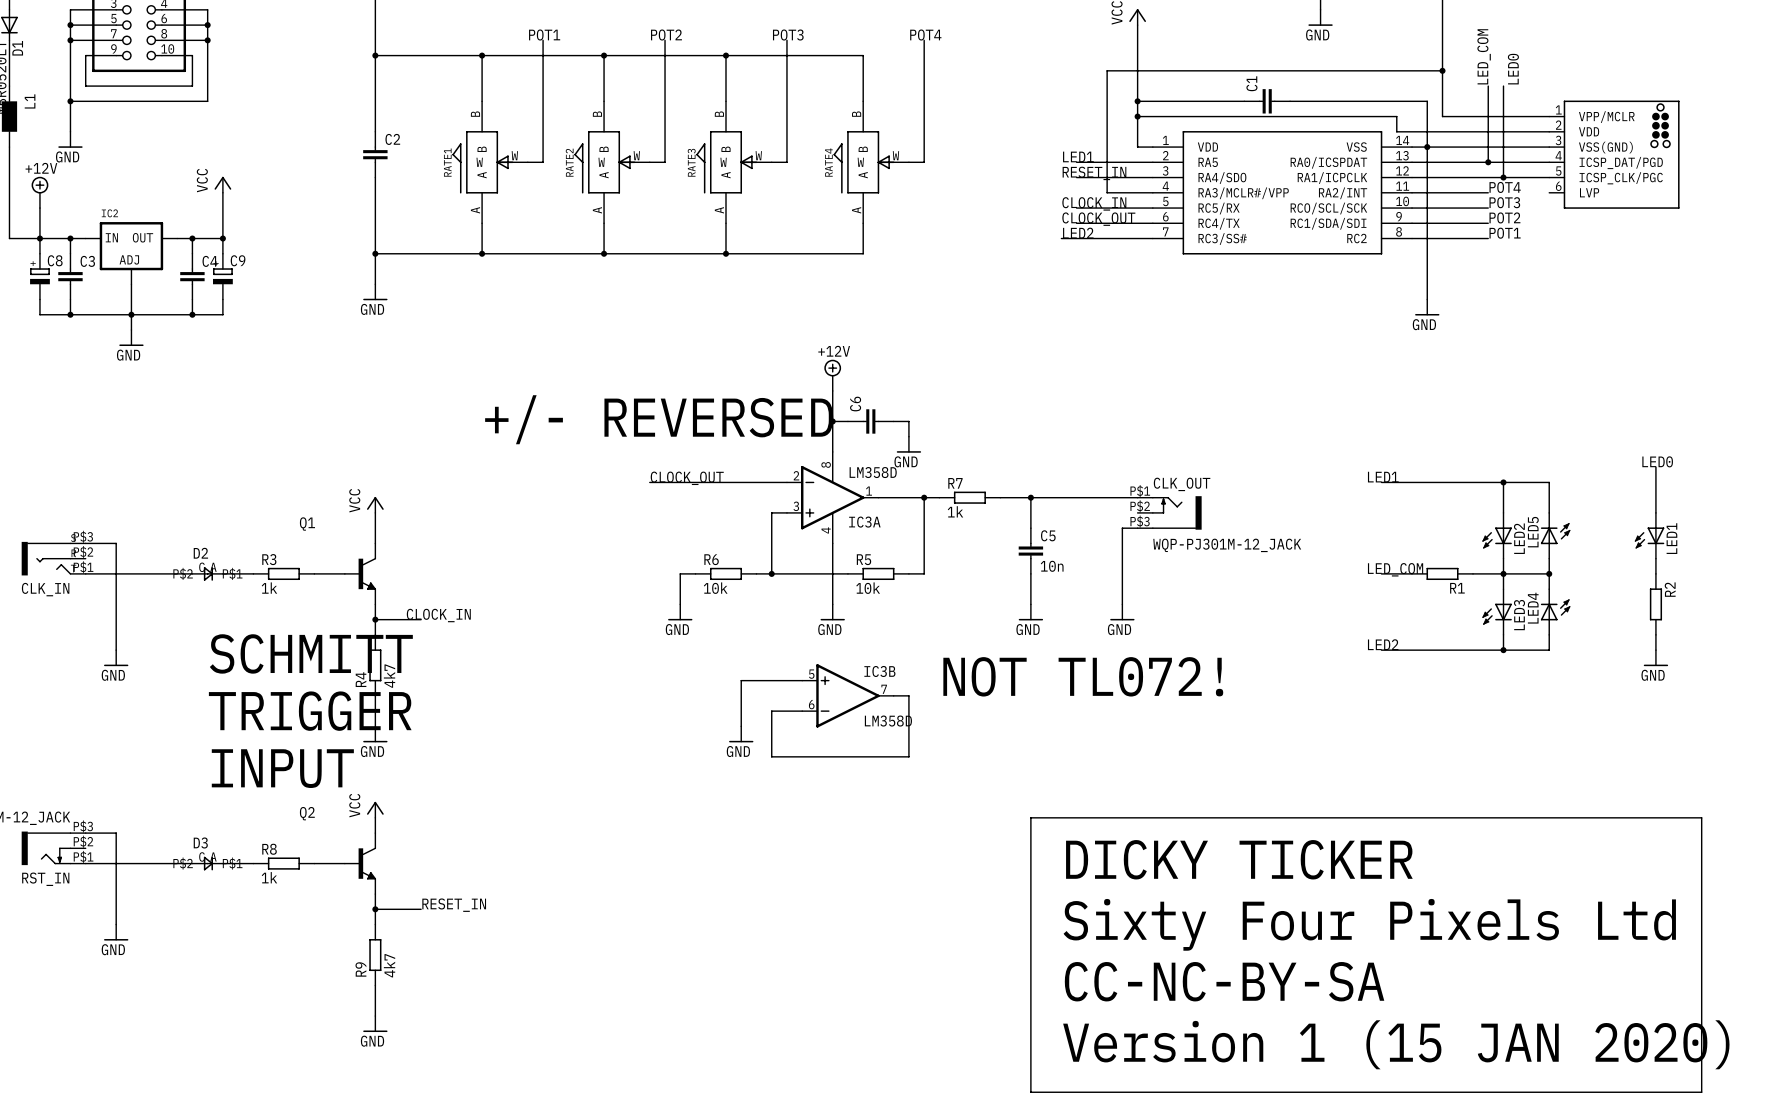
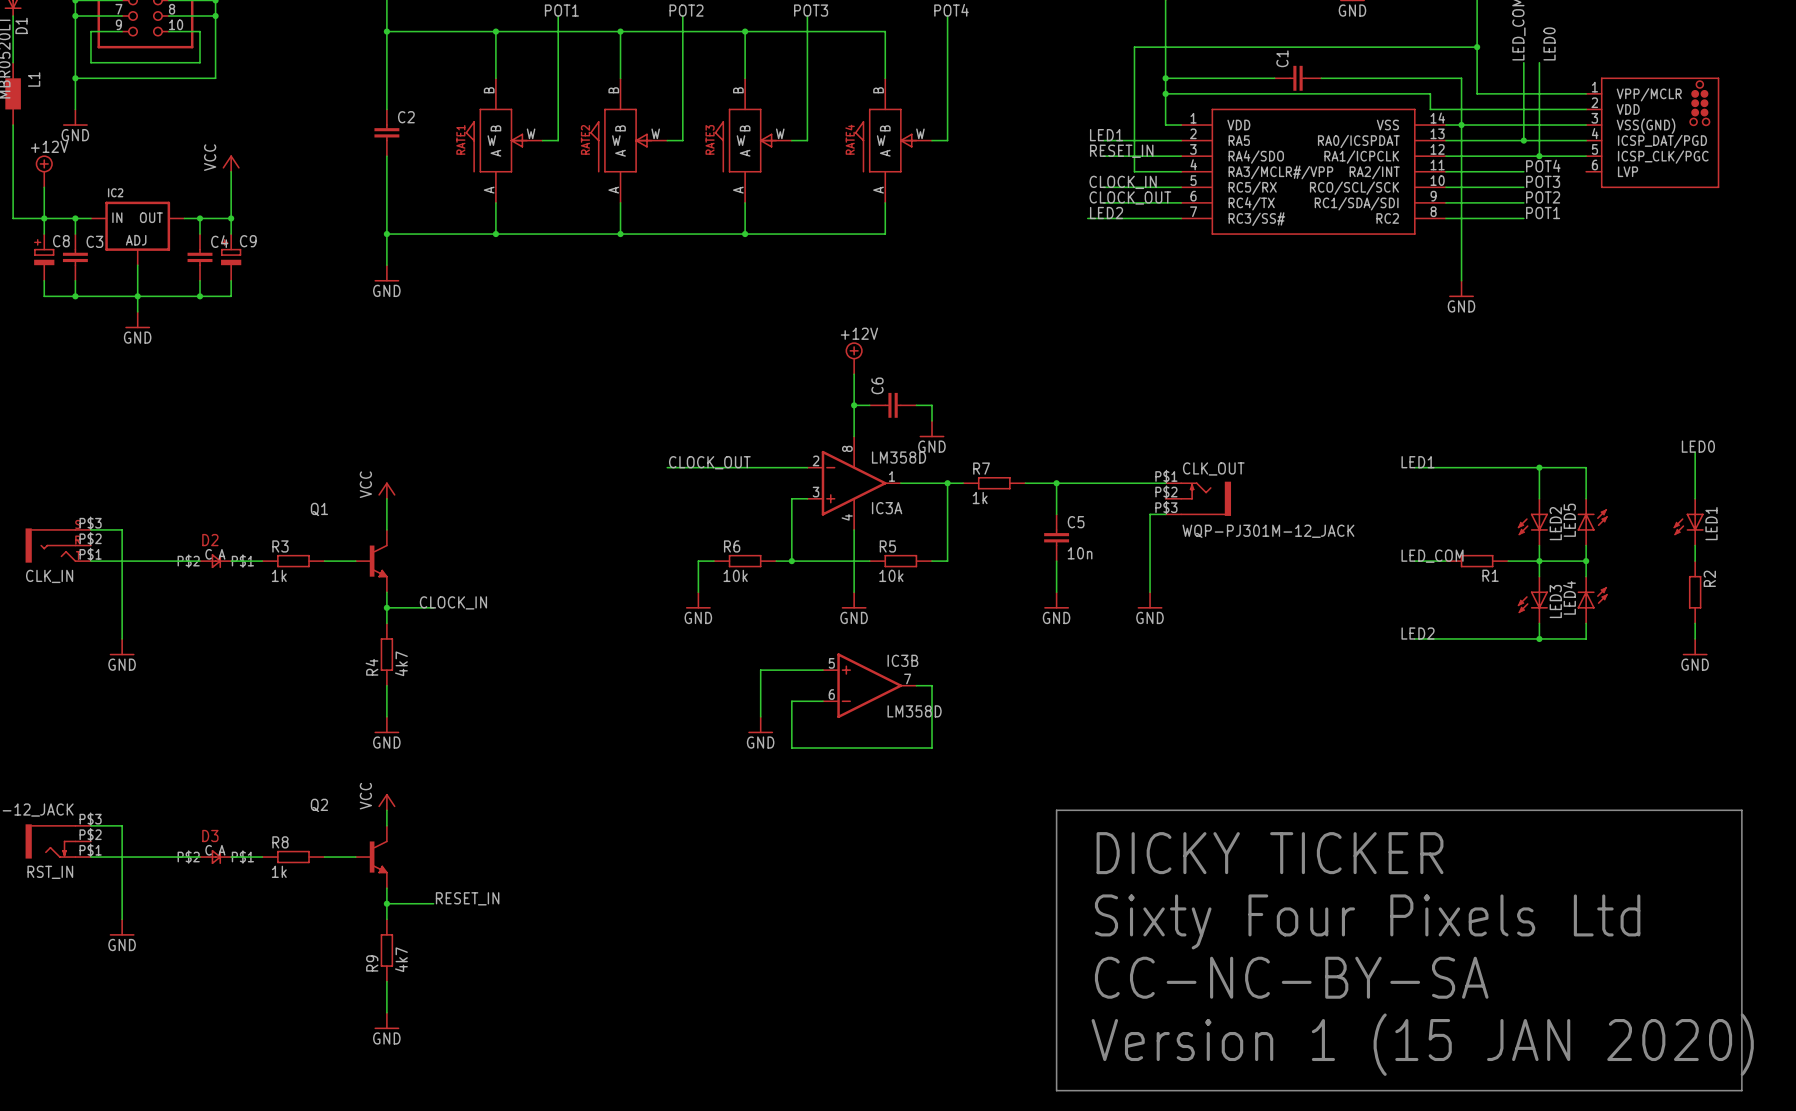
text: +/- REVERSED (659, 419) -> none
text: SCHMITT (311, 653) -> none
text: NOT TL072! (1083, 676) -> none
text: TRIGGER (310, 711) -> none
text: INPUT (282, 768) -> none

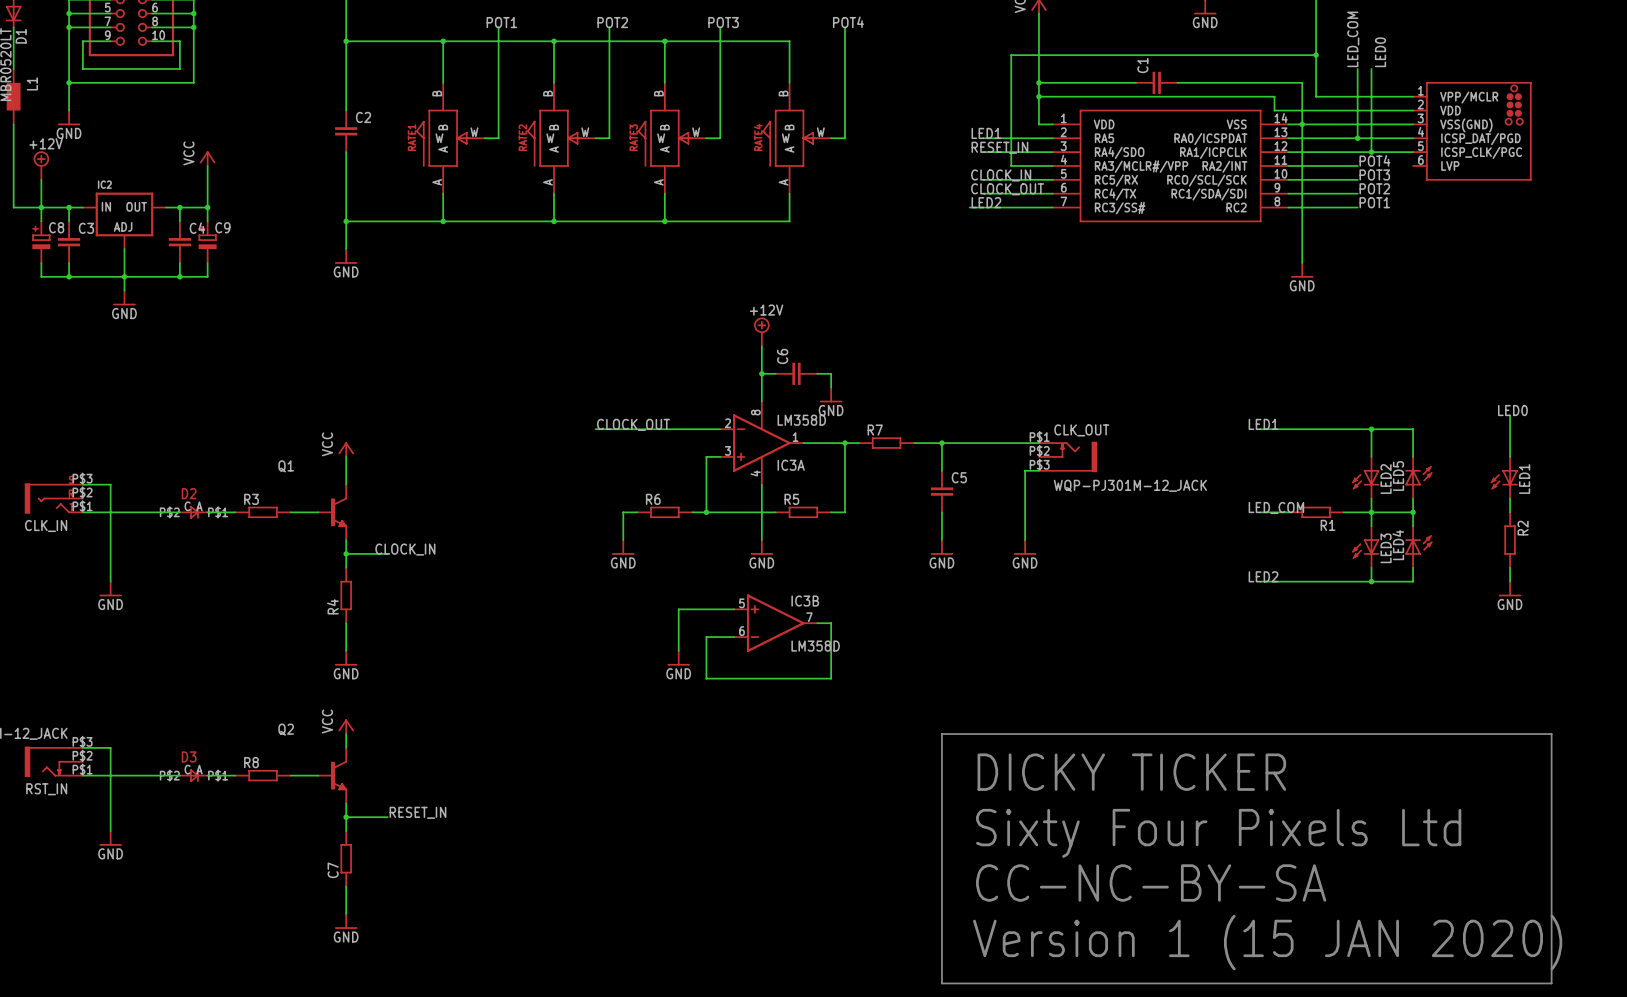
R7 value: 1k (980, 498) -> none
C5 value: 10n (1080, 553) -> none
R3 value: 1k (279, 575) -> none
R6 value: 10k (735, 575) -> none
R5 value: 10k (891, 575) -> none
R4 value: 4k7 (401, 663) -> none
R8 value: 1k (279, 871) -> none
R9 value: 4k7 (401, 959) -> none
R9 name: R9 (372, 963) -> C7 (333, 870)

